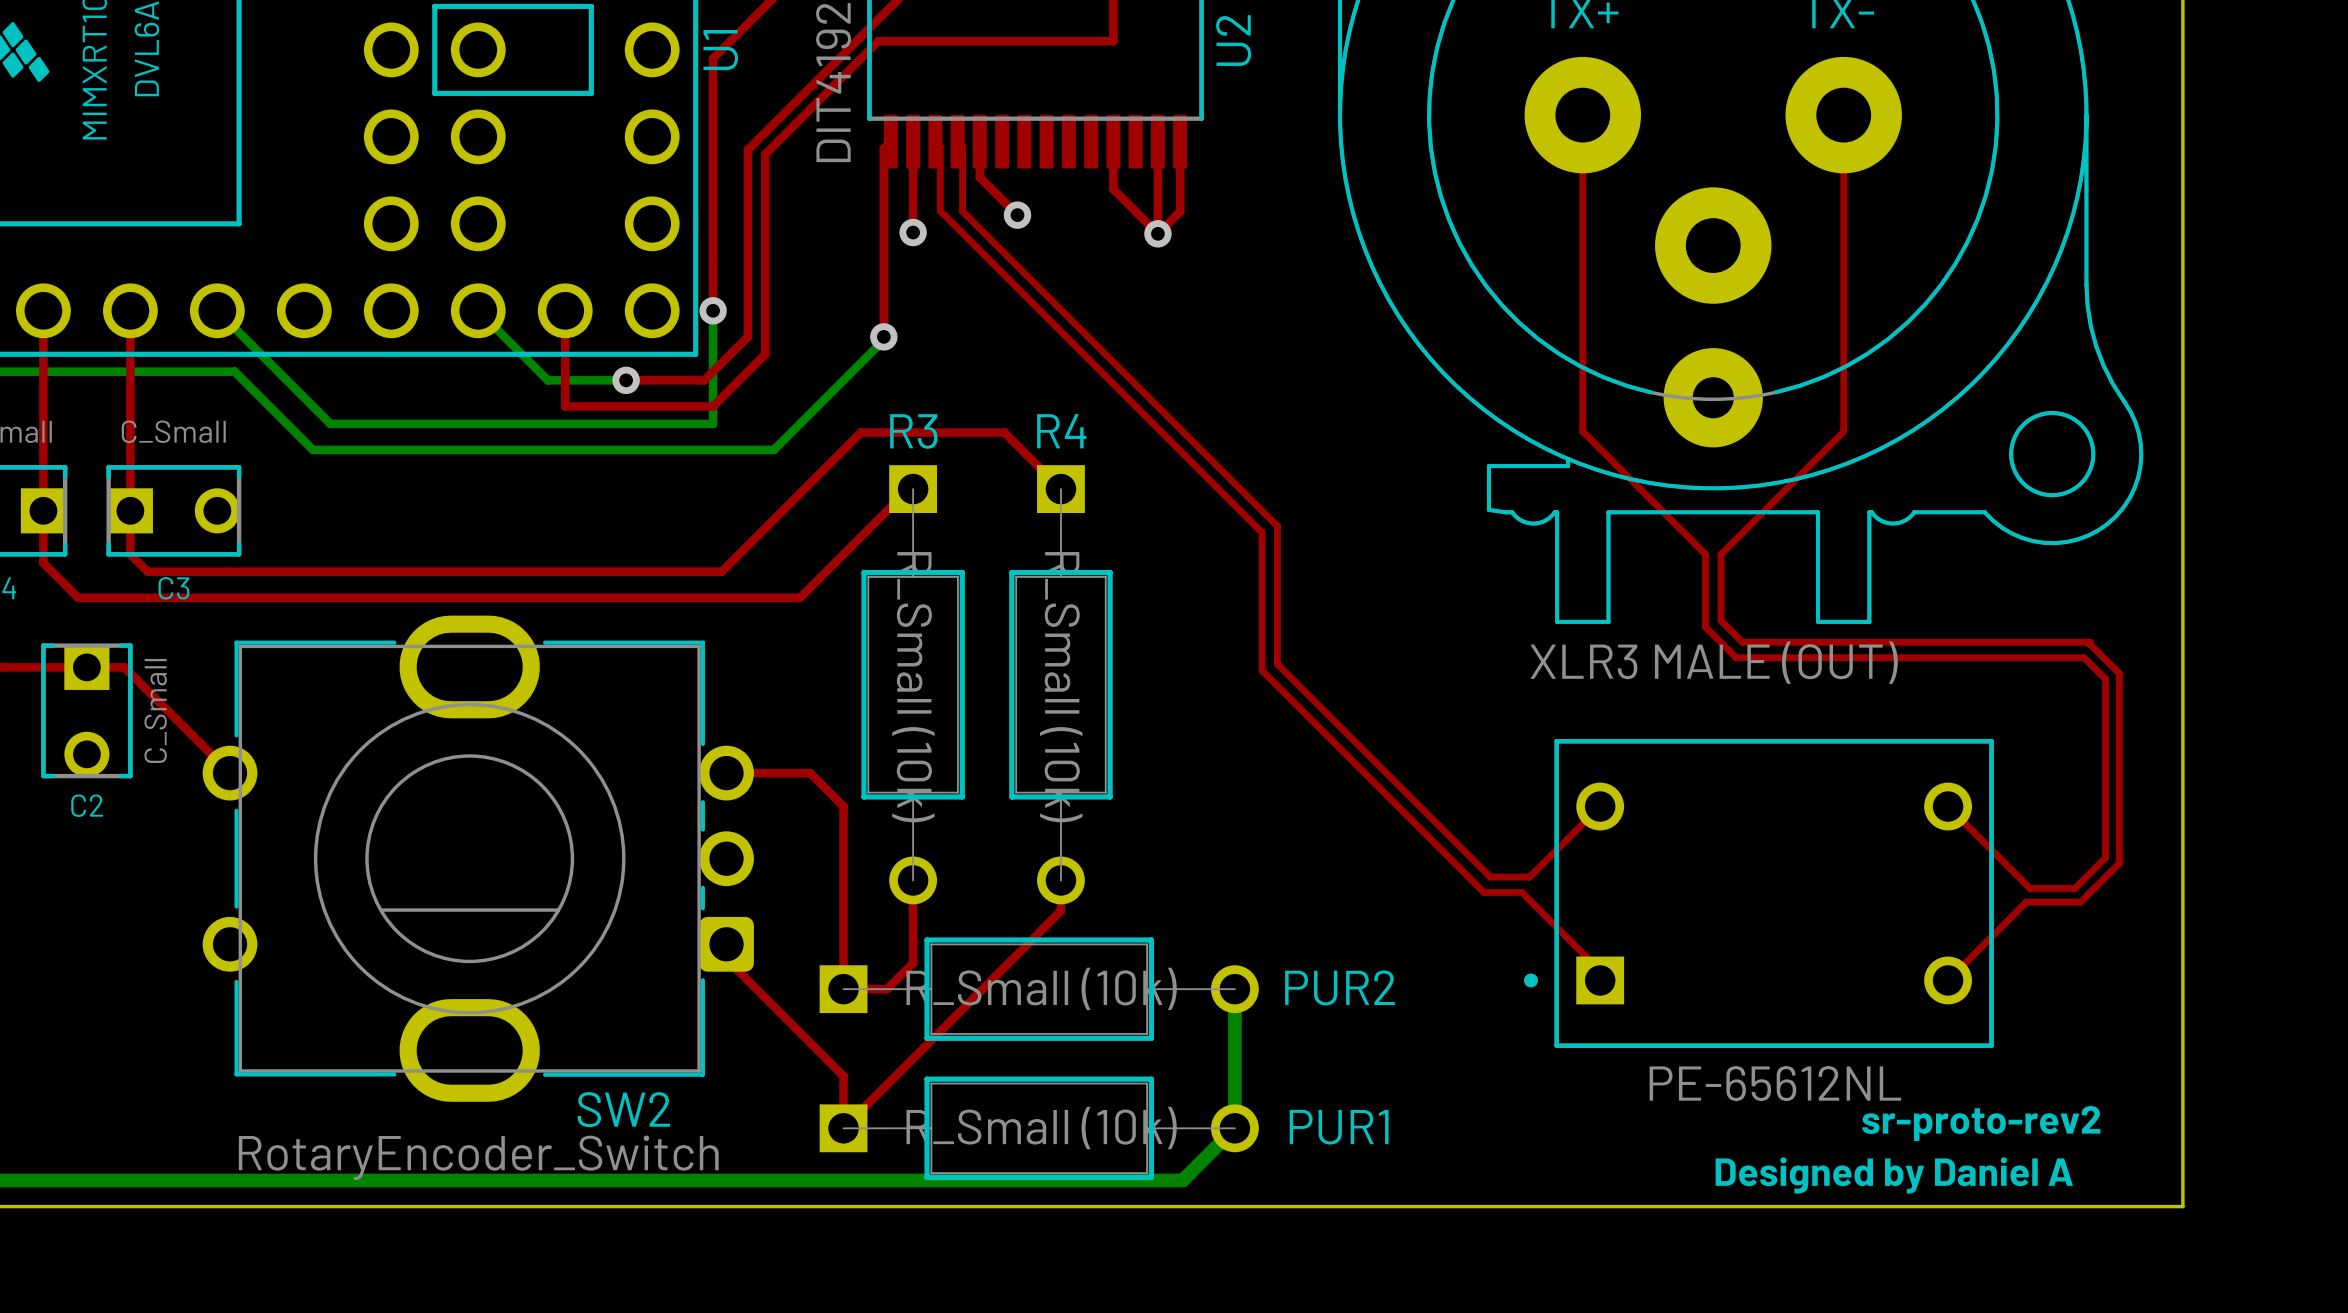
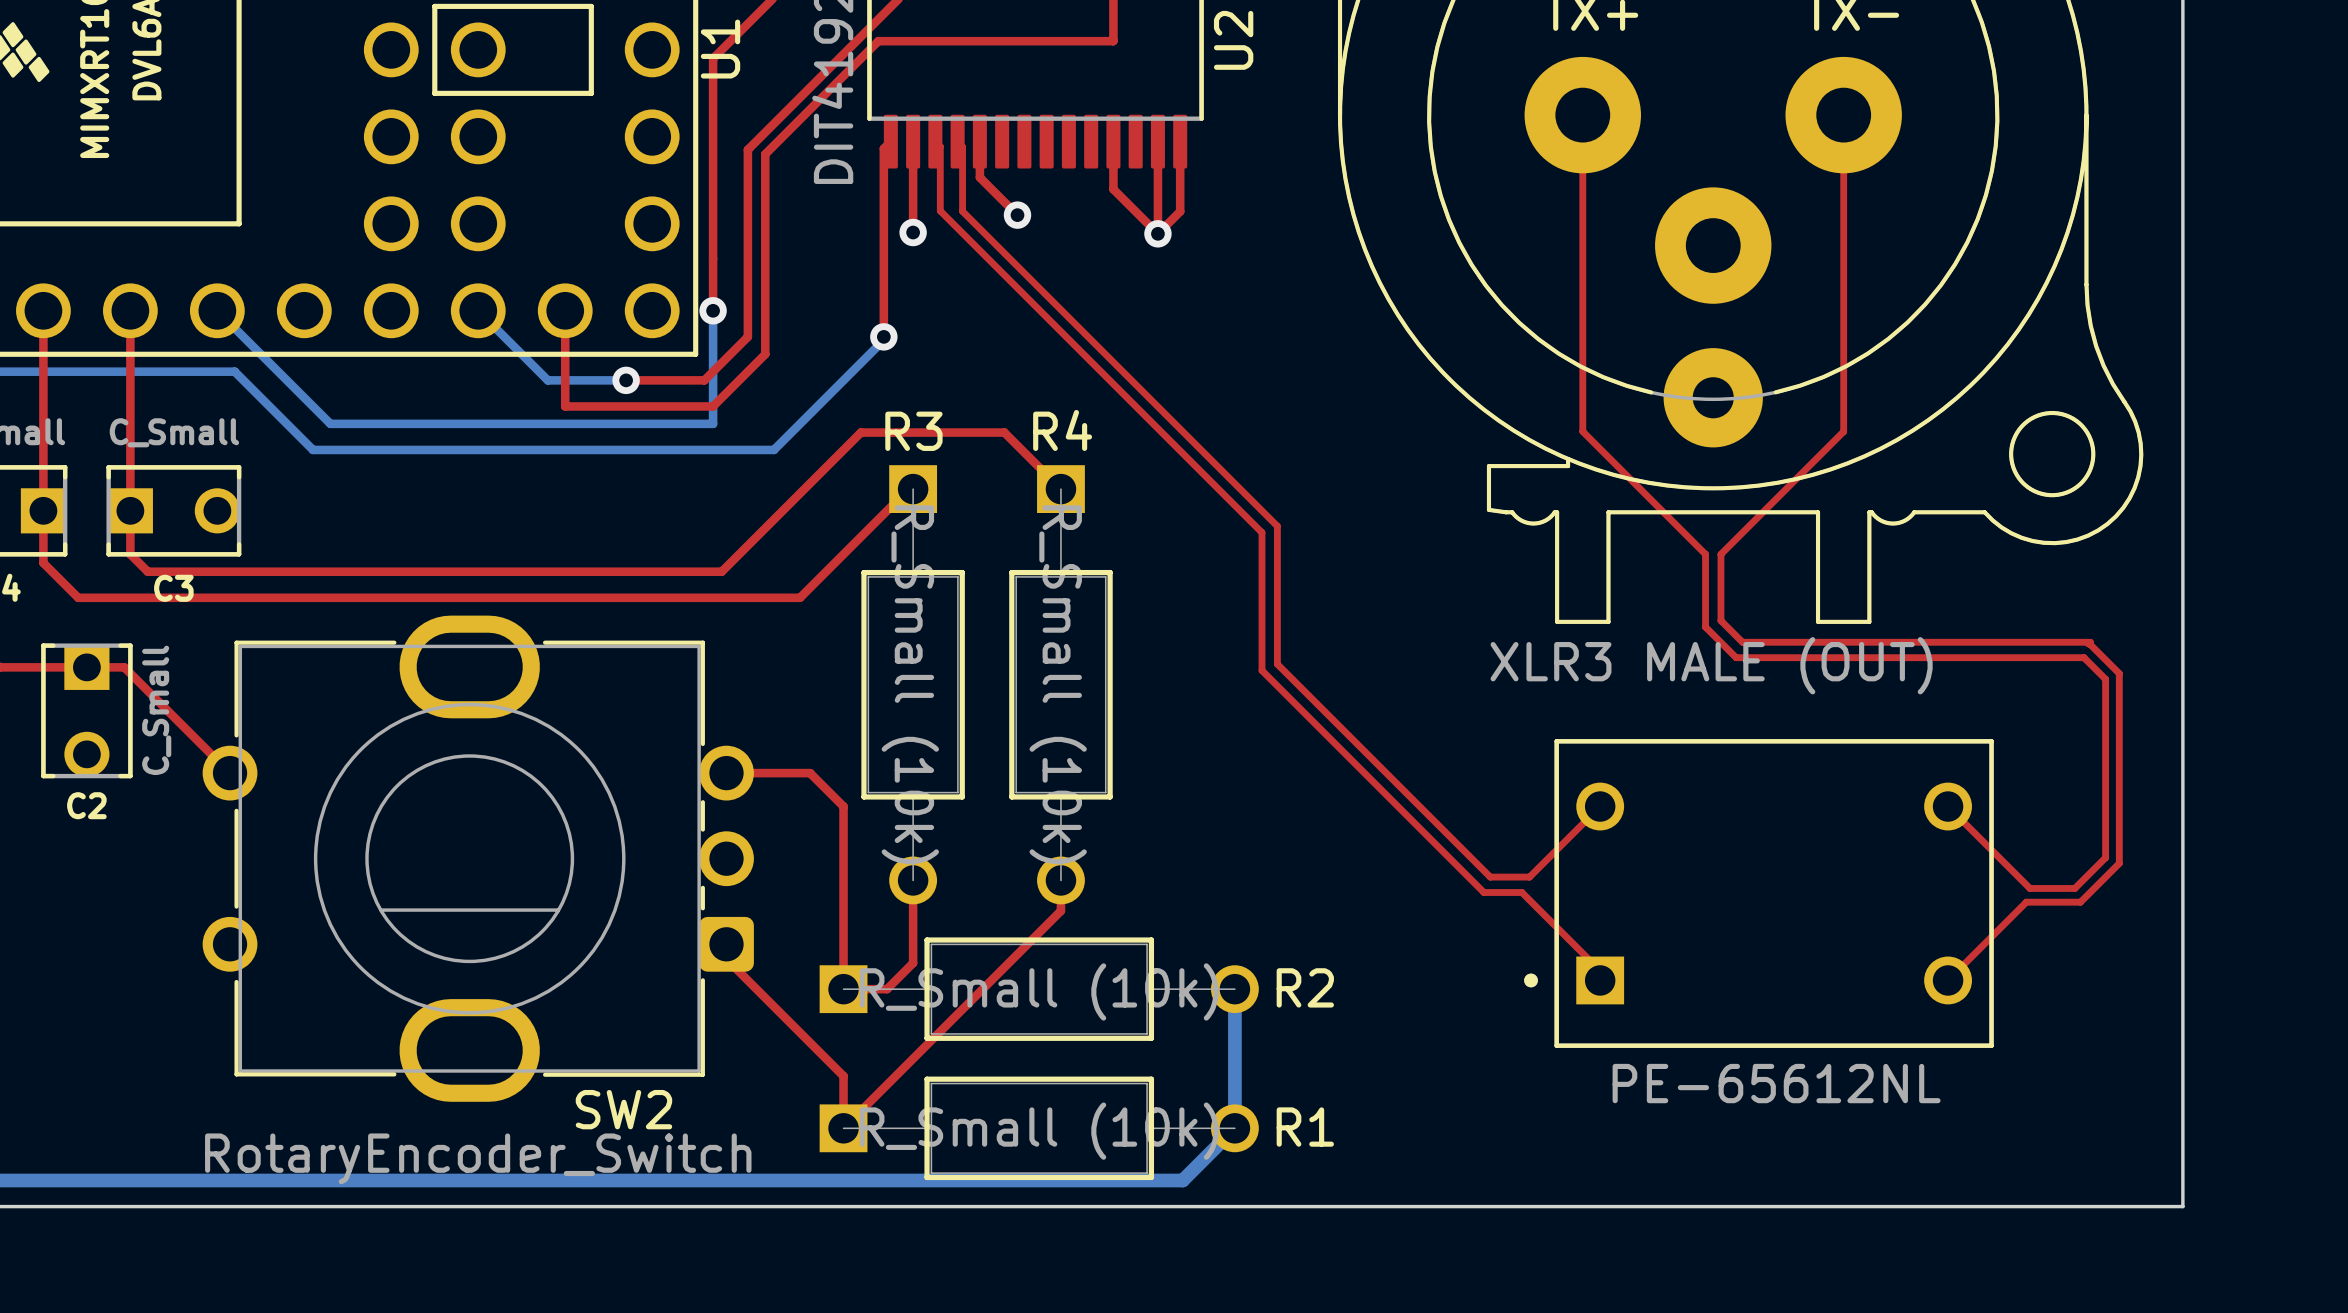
PUR2 name: PUR2 (1339, 987) -> R2 (1305, 987)
text: sr-proto-rev2 (1981, 1123) -> none
PUR1 name: PUR1 (1339, 1127) -> R1 (1305, 1127)
text: Designed by Daniel A (1894, 1175) -> none

